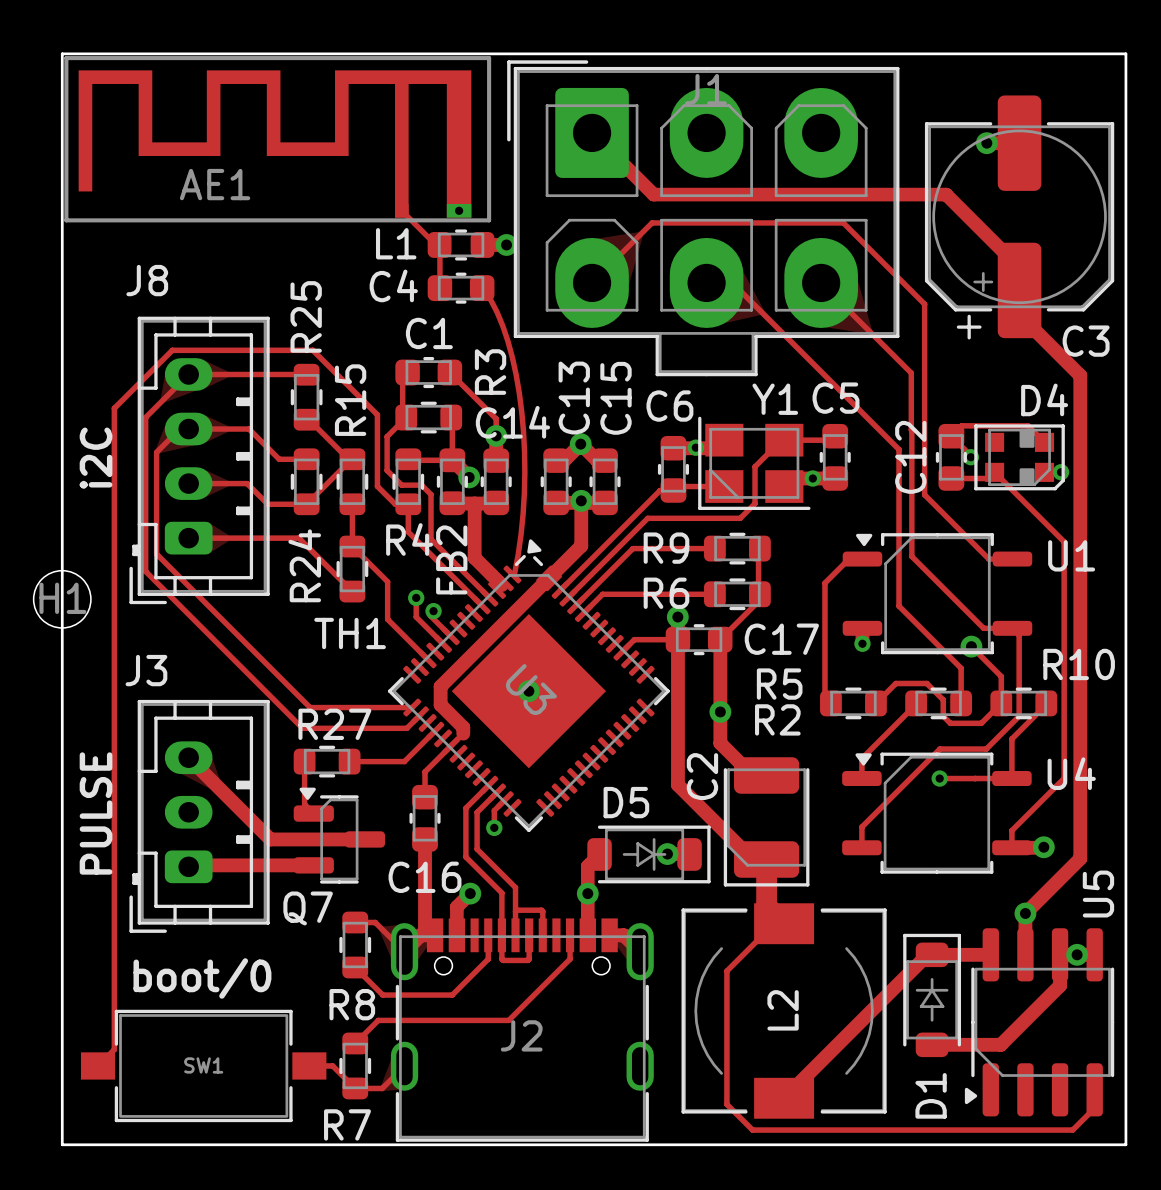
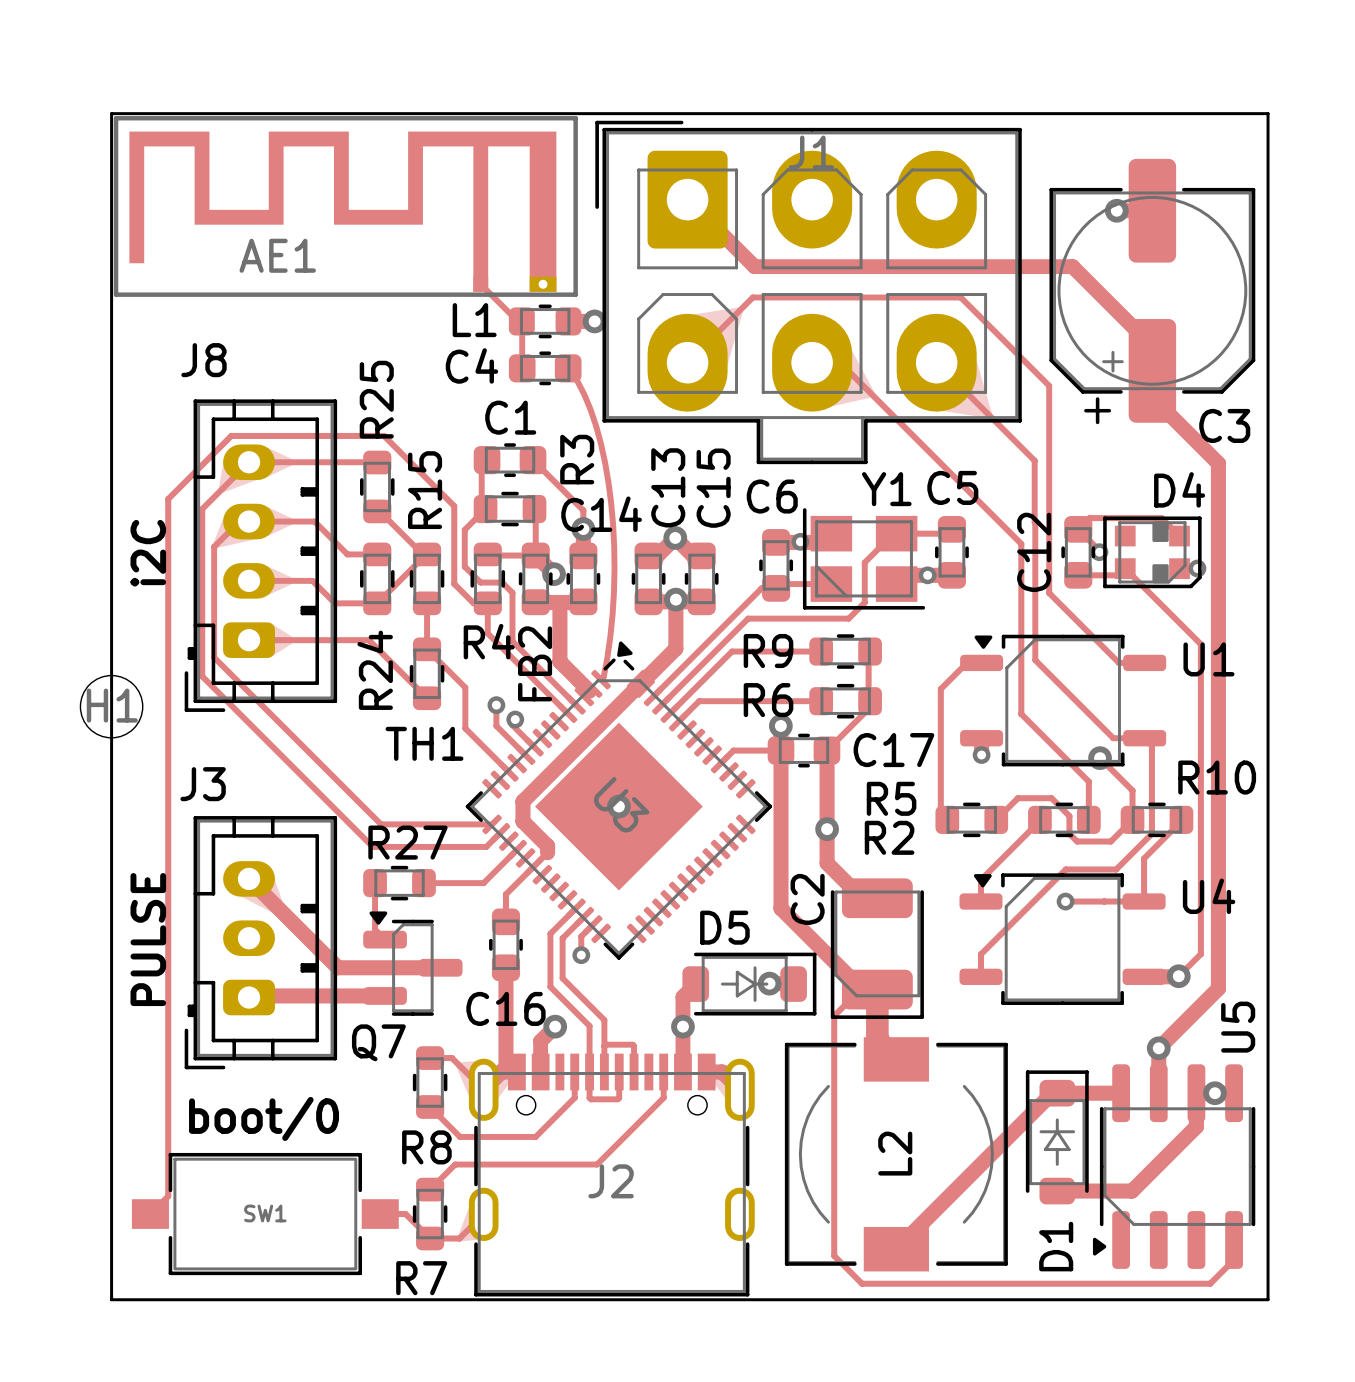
track: (1064, 778) (1011, 830) (1011, 847) -> (1200, 901) (1200, 954) (1178, 976)
track: (784, 923) (774, 923) (726, 971) -> (877, 989) (860, 989) (834, 1015) (834, 1110)

